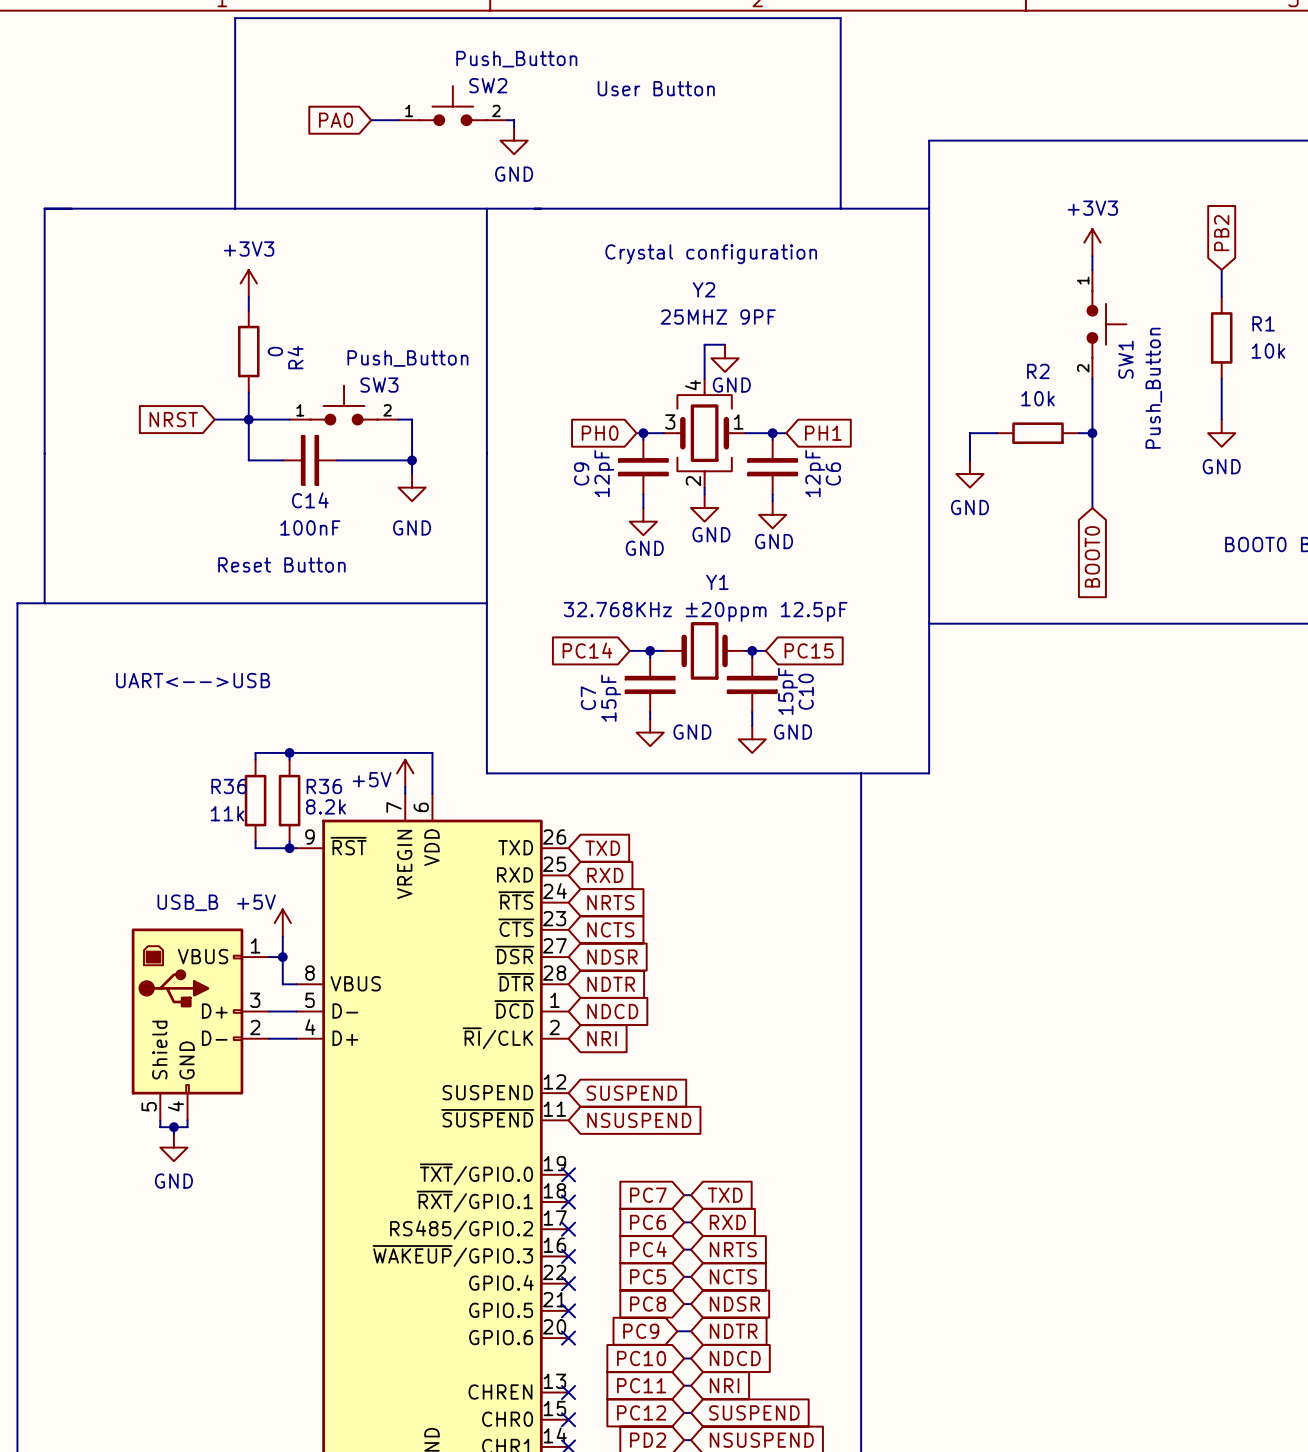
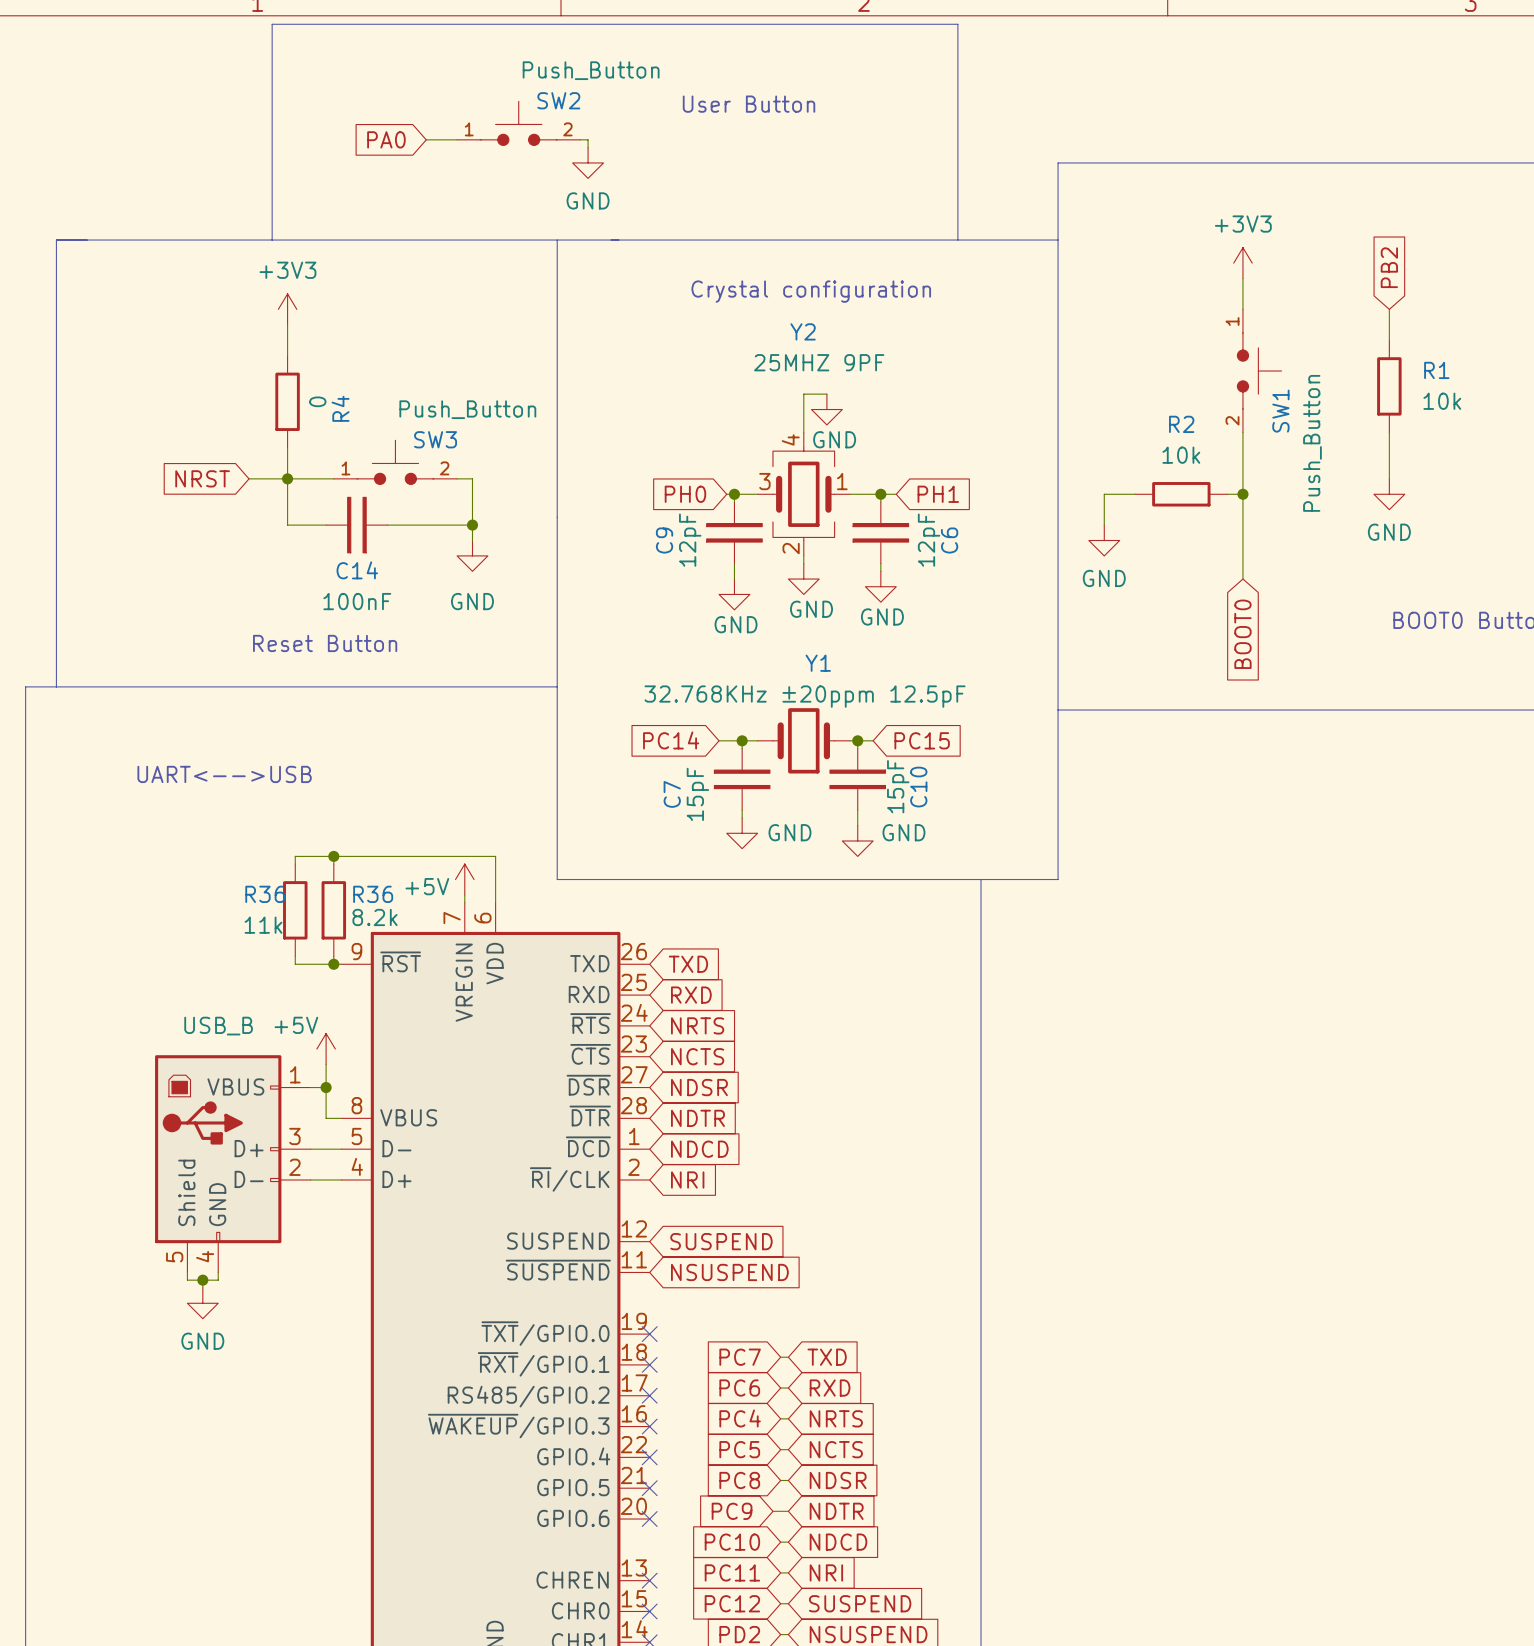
power symbol position: +3V3 (1092, 242) -> +3V3 (1242, 263)
power symbol position: +3V3 (248, 283) -> +3V3 (287, 309)

